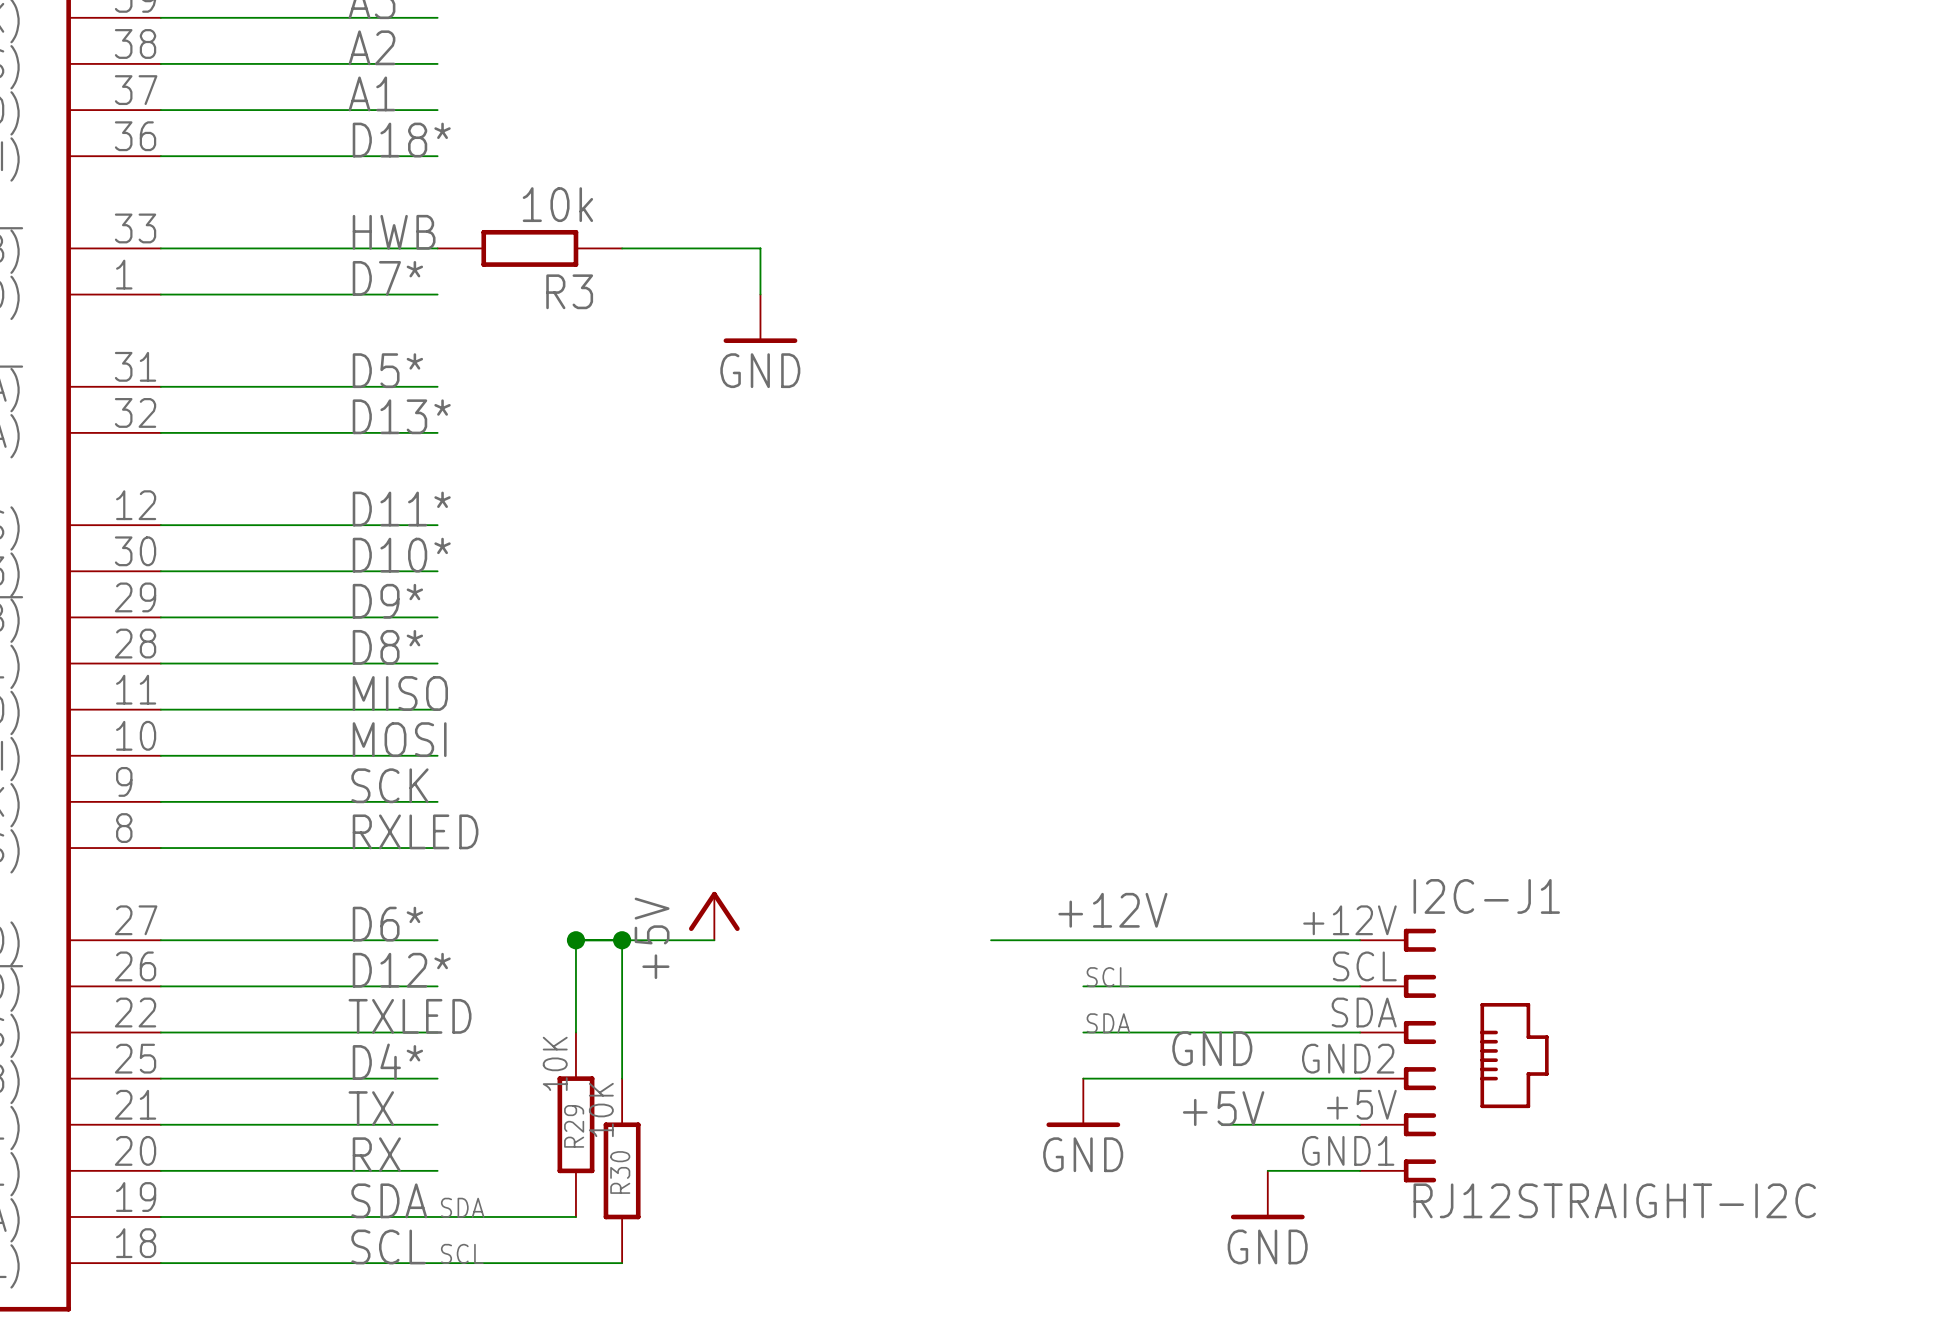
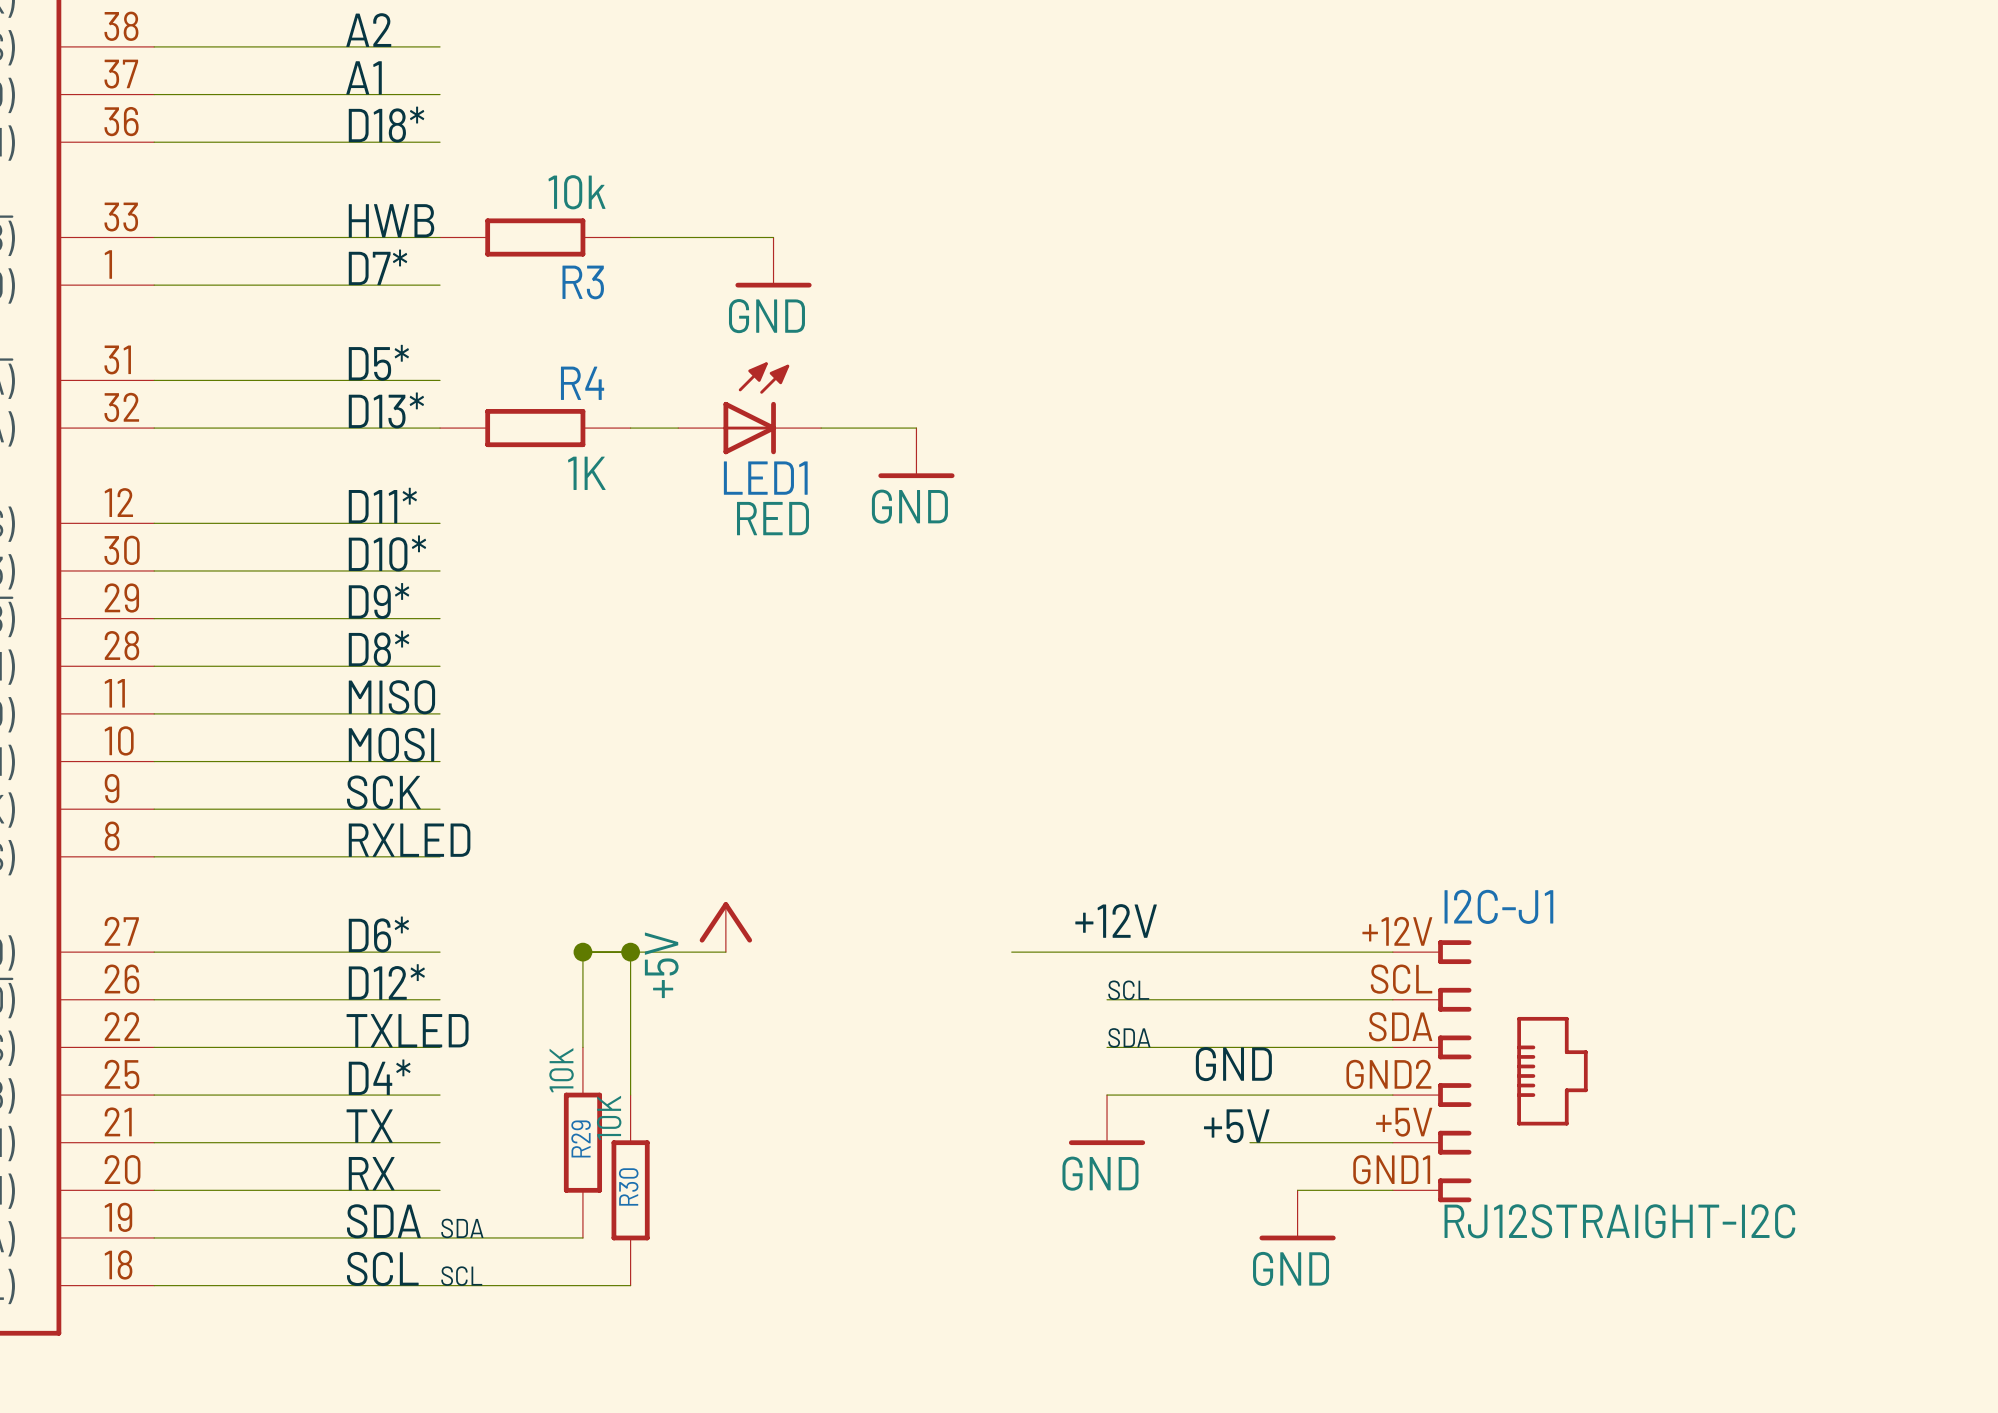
power symbol position: GND (760, 318) -> GND (773, 262)
LED1: none -> RED (749, 408)
R4: none -> 1K (535, 428)
wire: none -> (630, 428) (678, 428)
wire: none -> (821, 428) (916, 428)
power symbol: none -> GND (916, 453)

